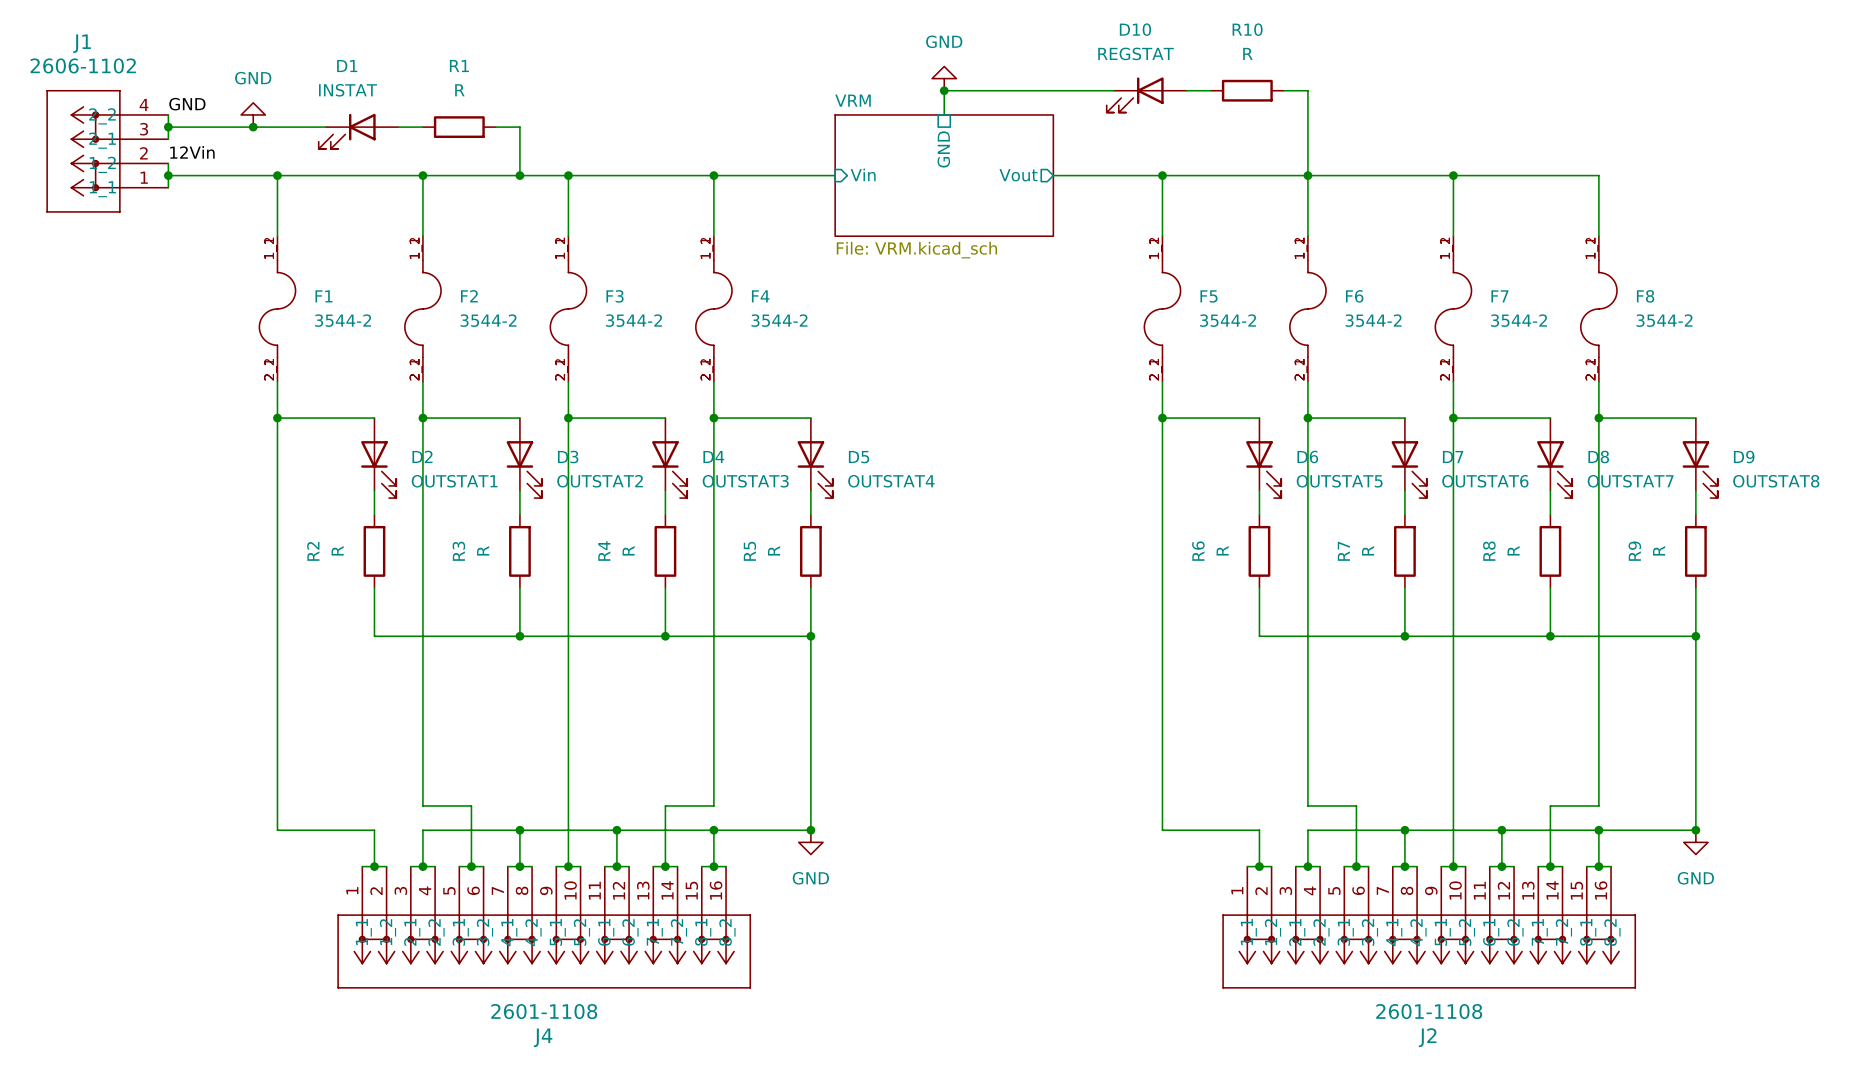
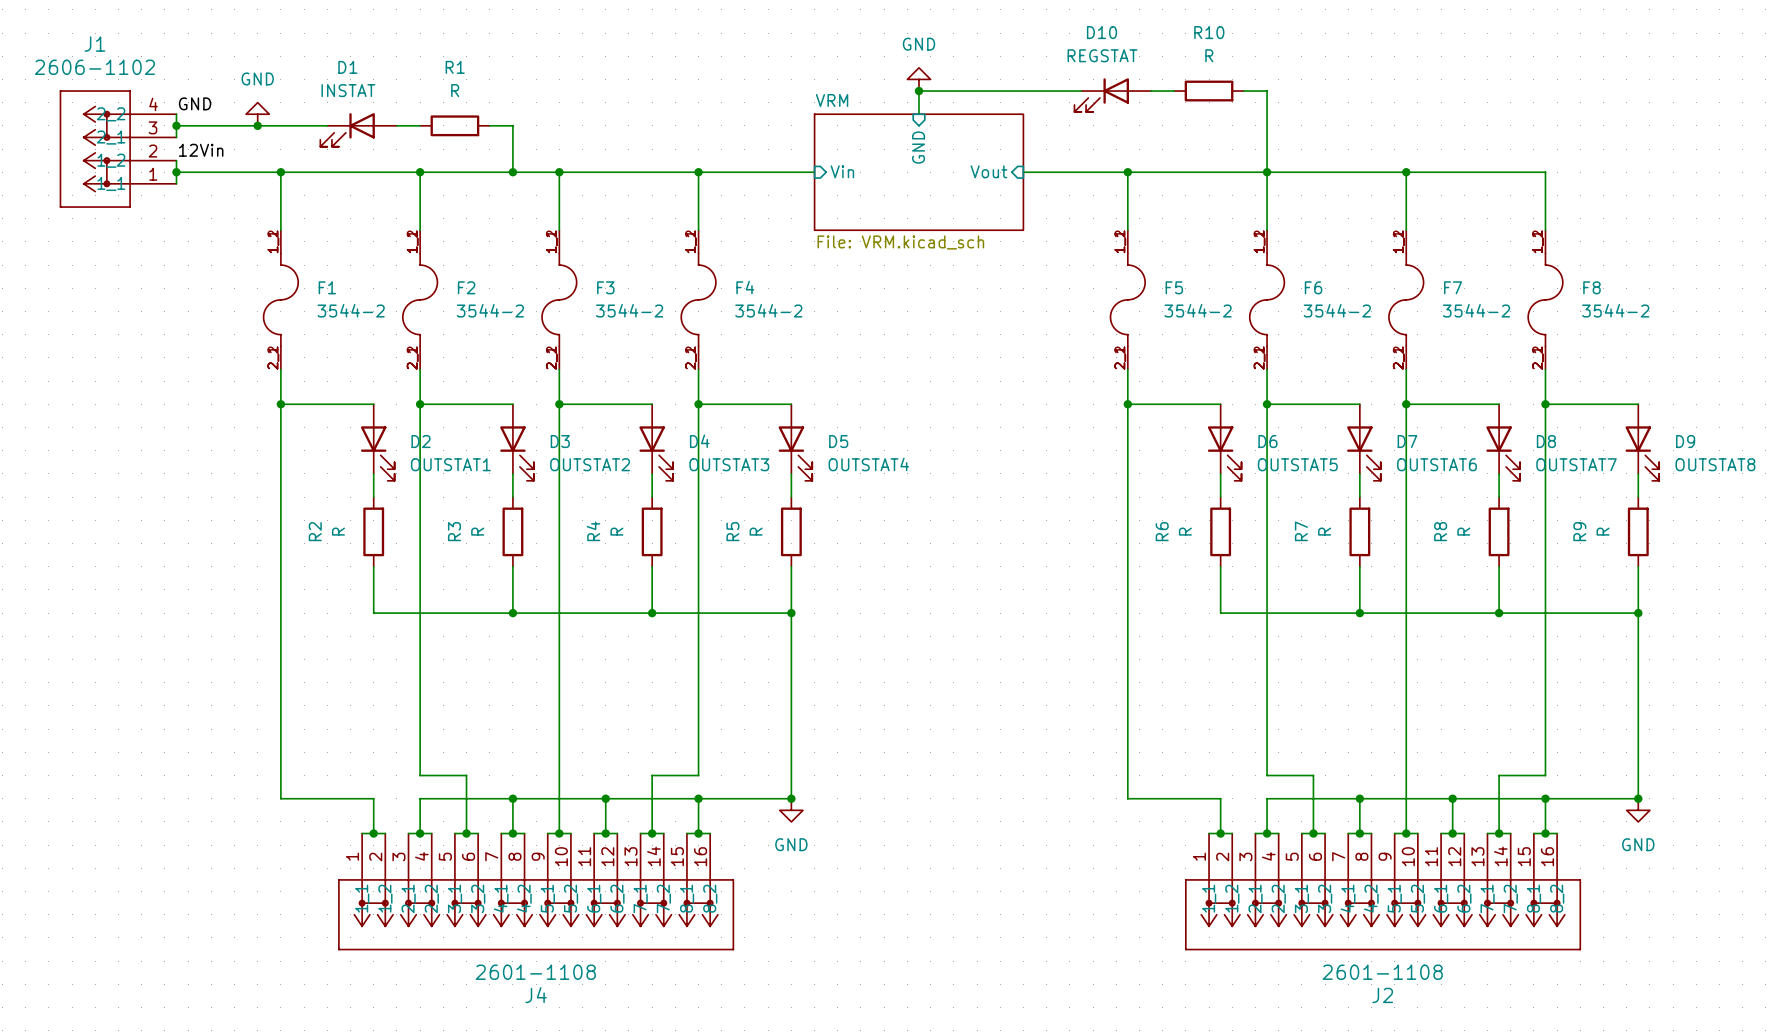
sheet pin shape: passive (943, 149) -> input (918, 147)
sheet pin shape: output (1018, 175) -> input (988, 171)

